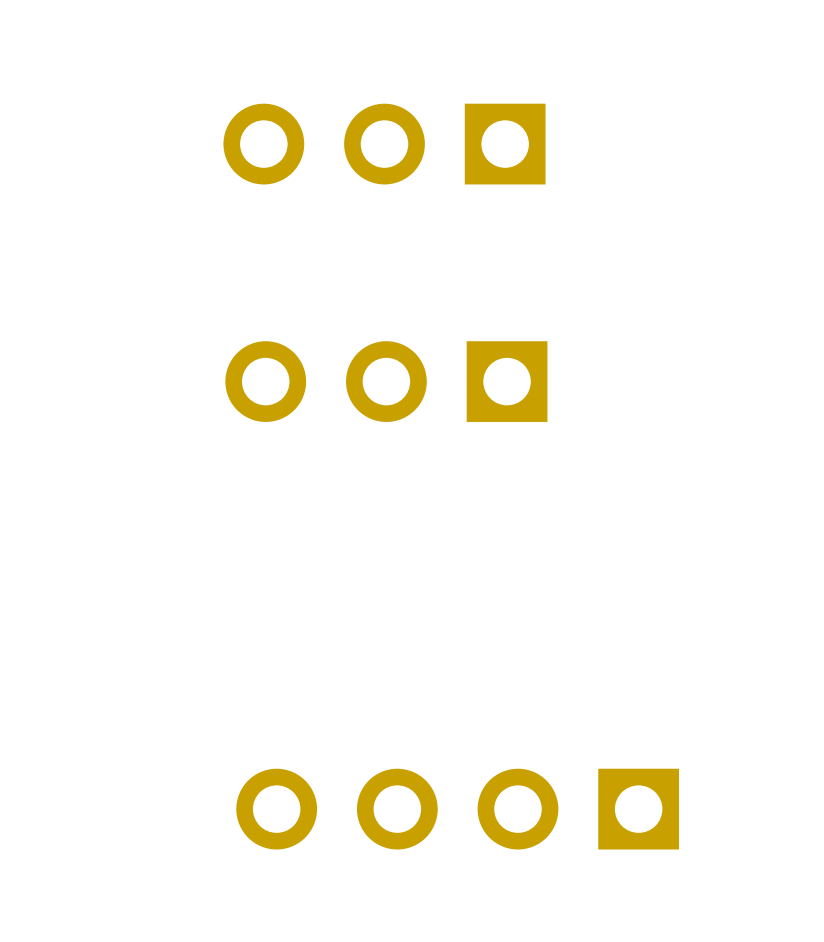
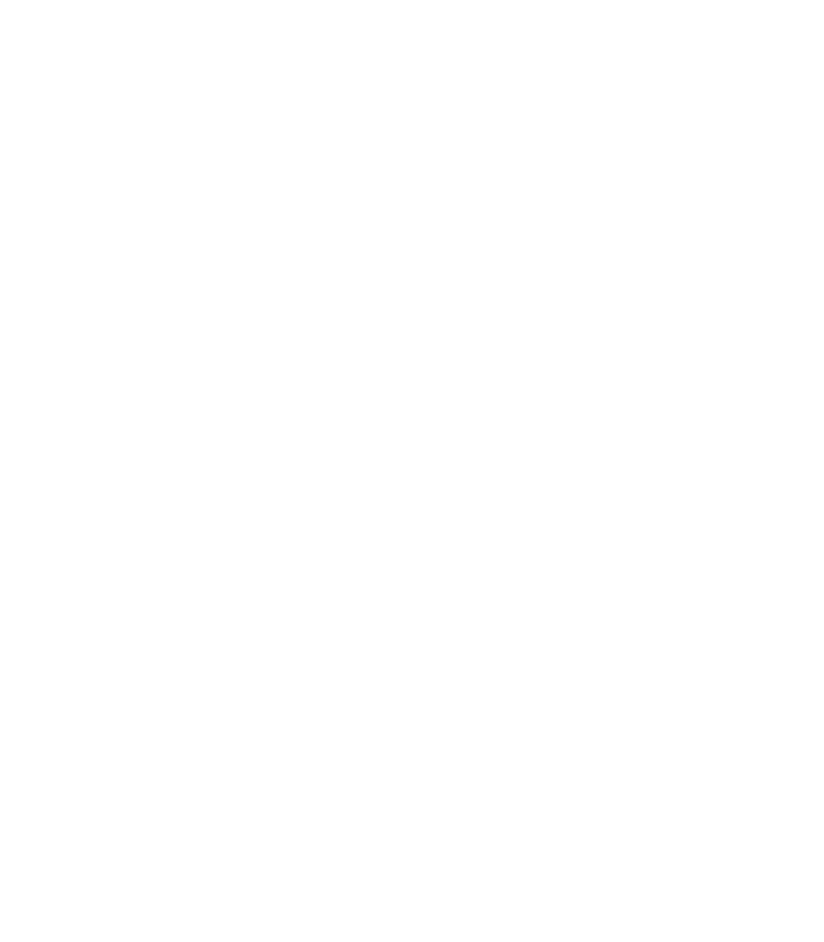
part: (384, 144) -> none
part: (386, 381) -> none
part: (457, 809) -> none

